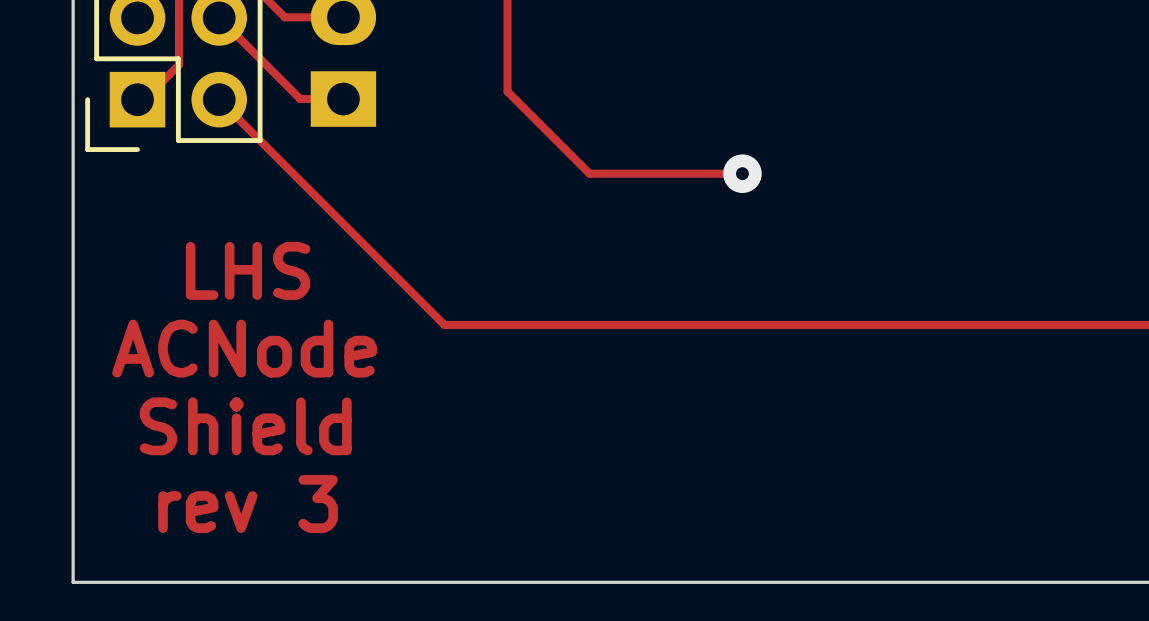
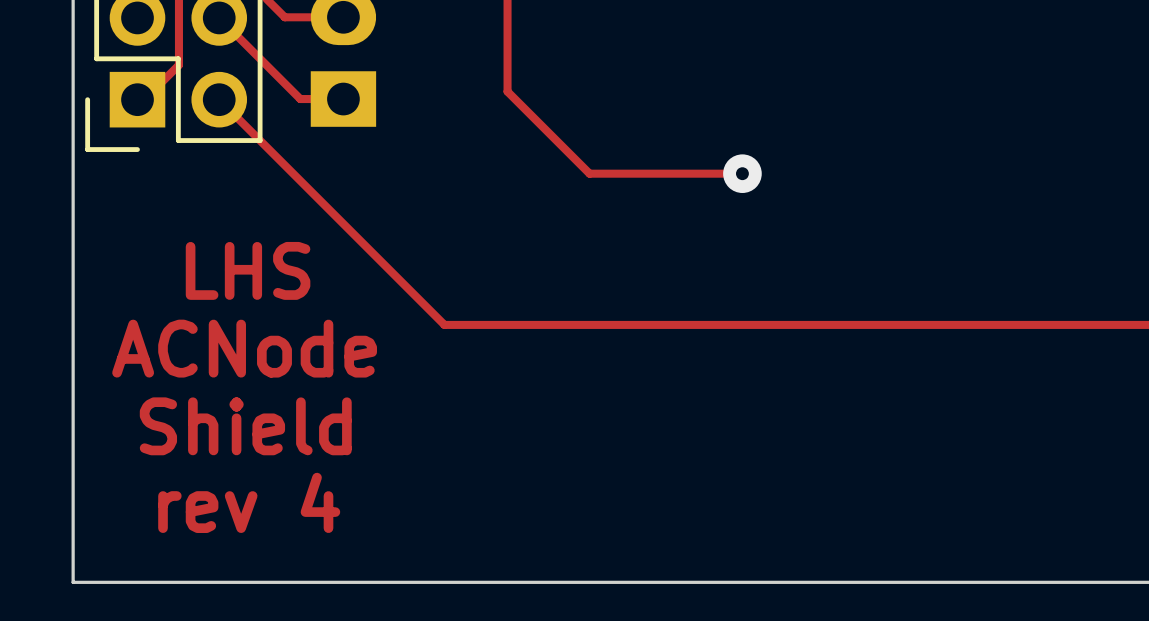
text: rev 3 (248, 504) -> rev 4 (249, 502)

